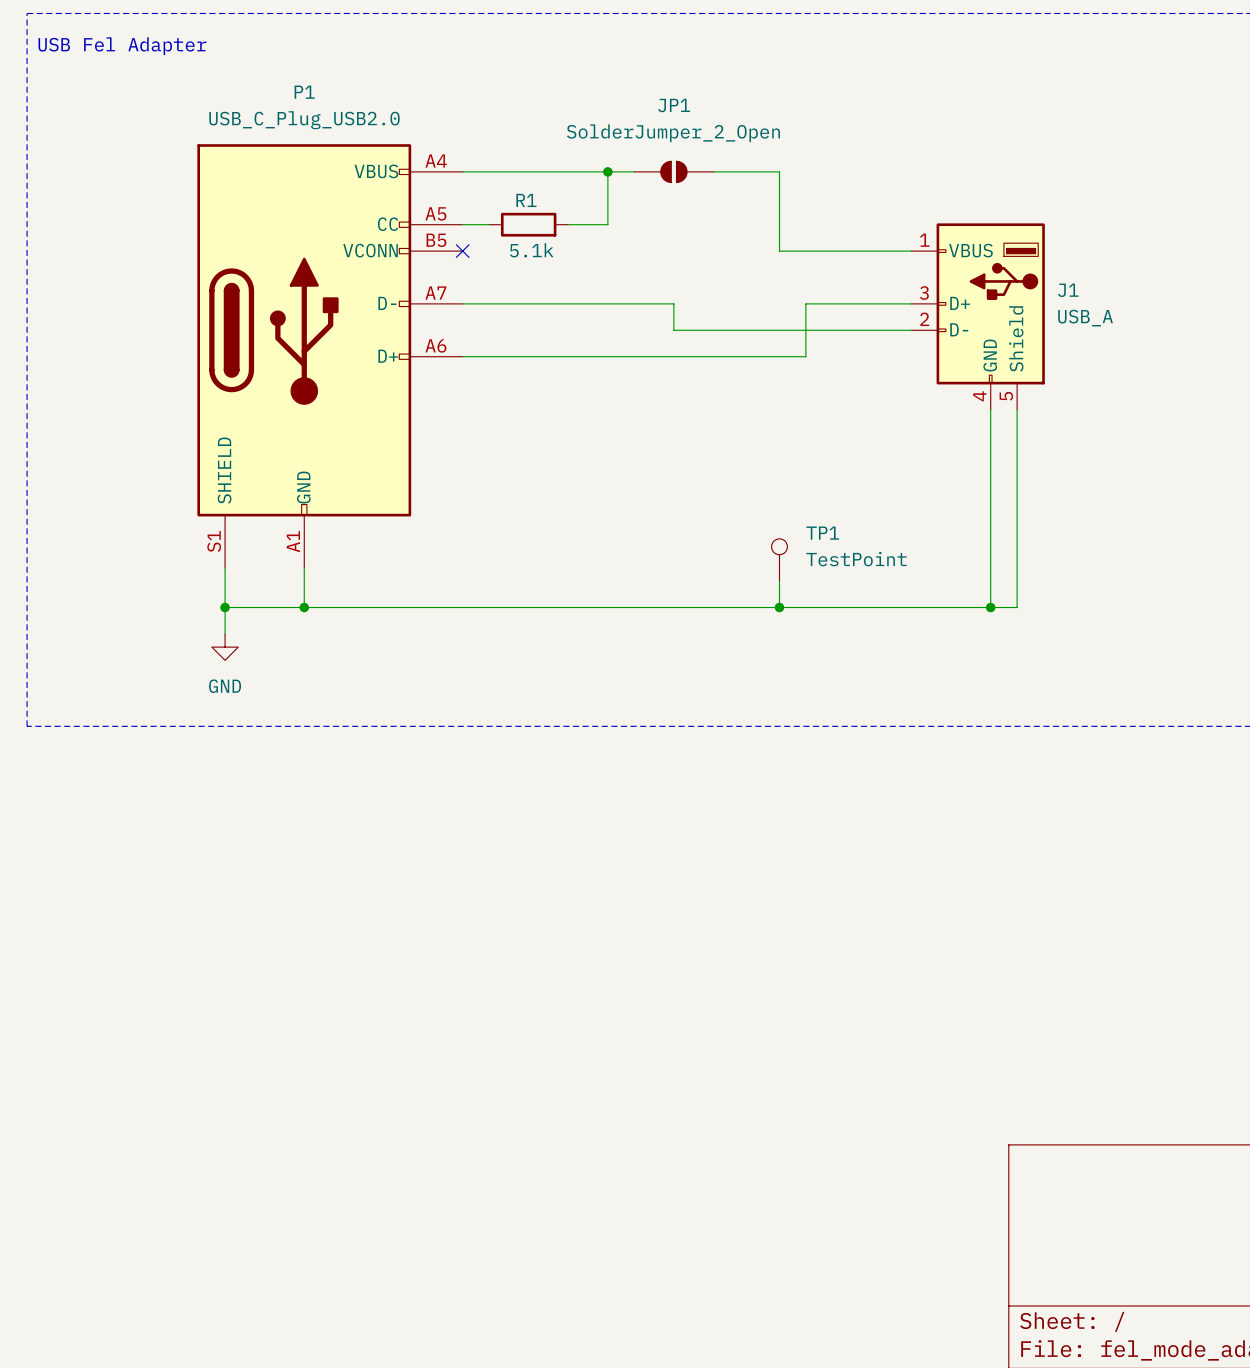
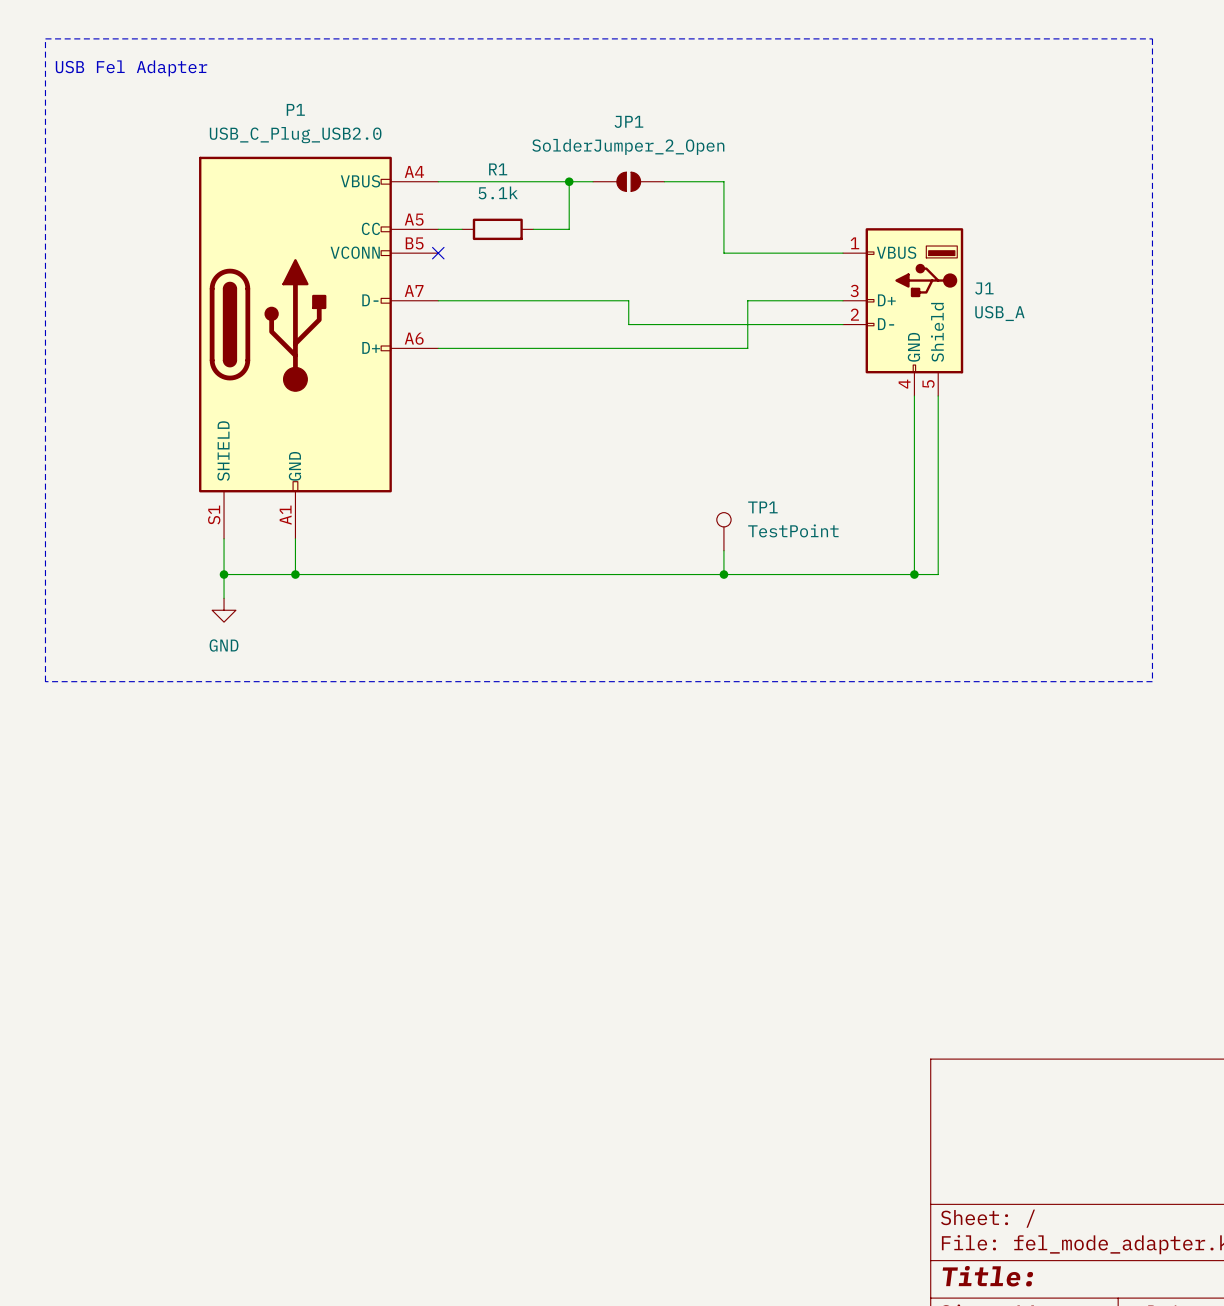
R1 name position: R1 (526, 200) -> R1 (498, 169)
R1 value position: 5.1k (531, 250) -> 5.1k (498, 192)

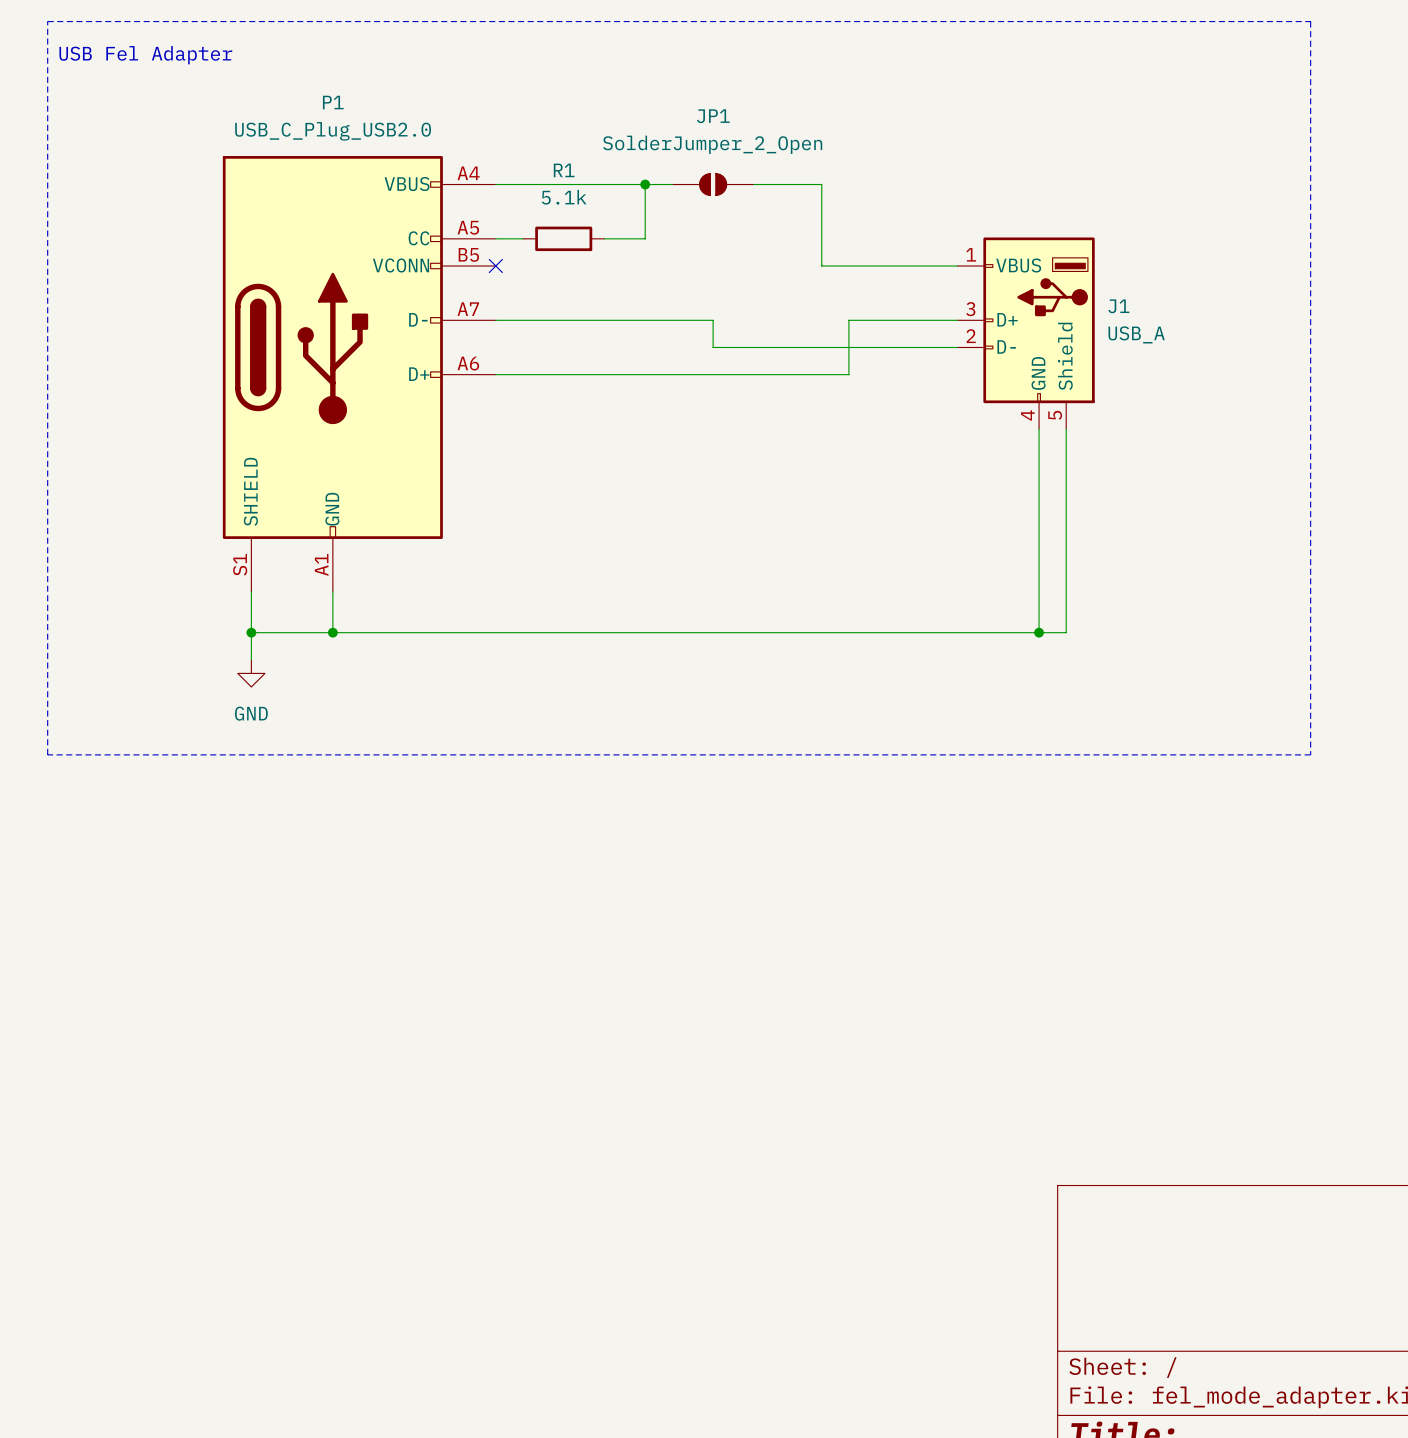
TP1: TestPoint (723, 531) -> none
wire: (723, 550) (723, 574) -> none
junction: (723, 574) -> none

